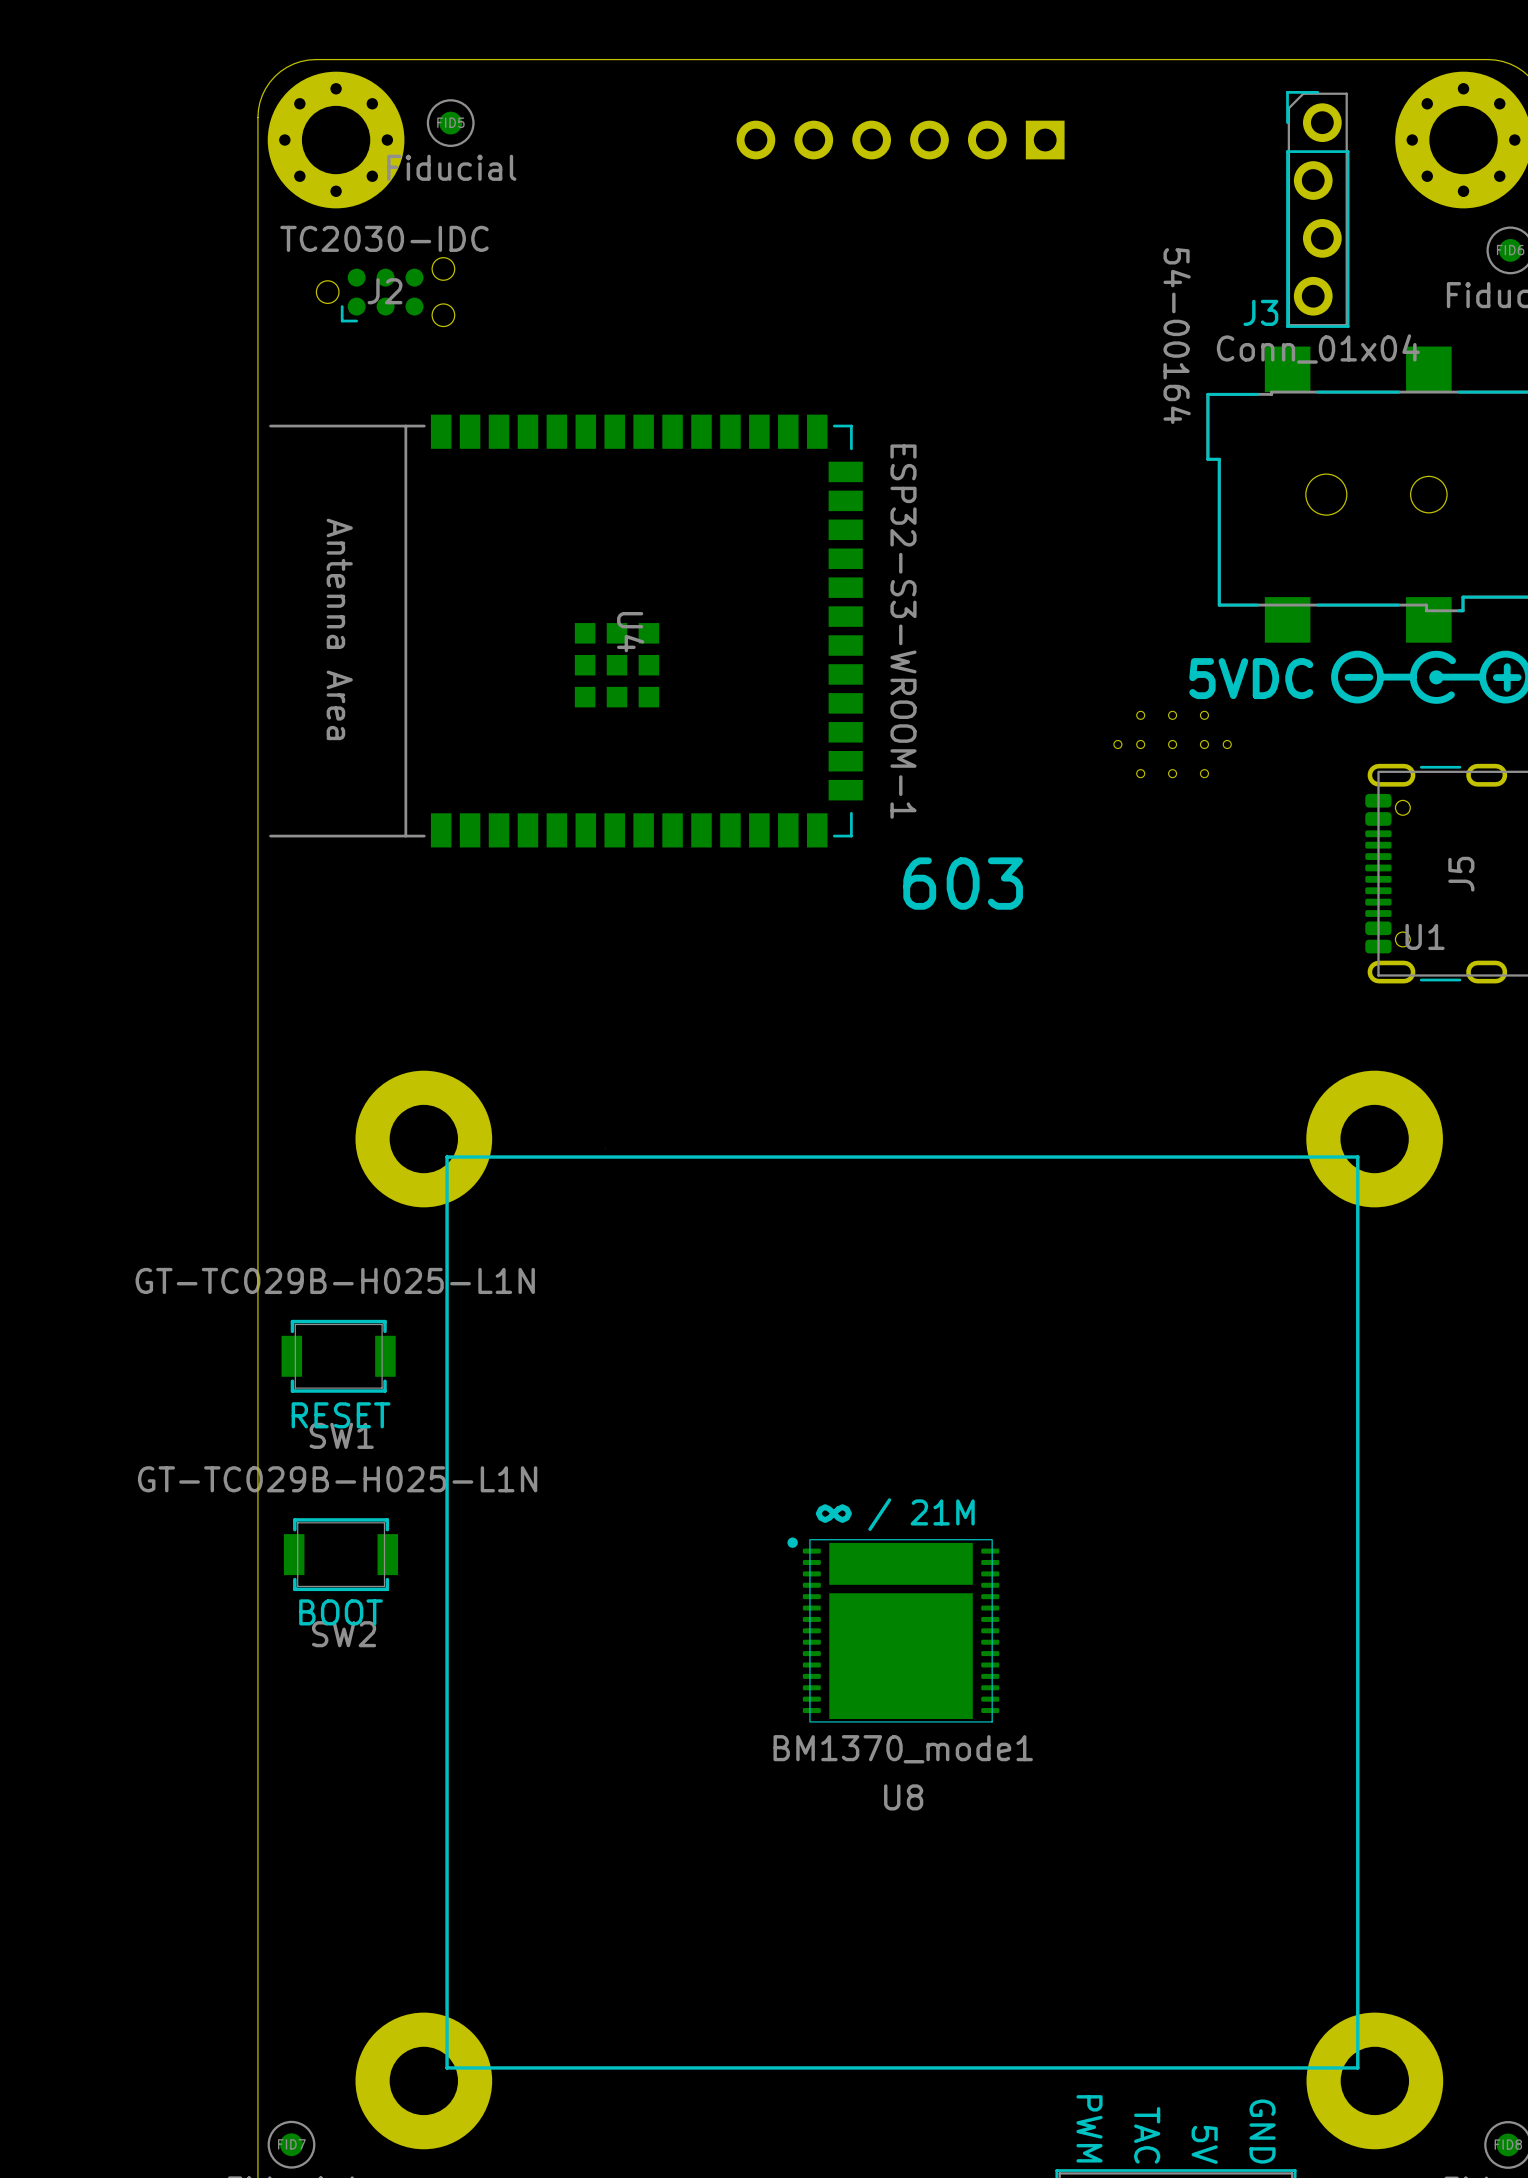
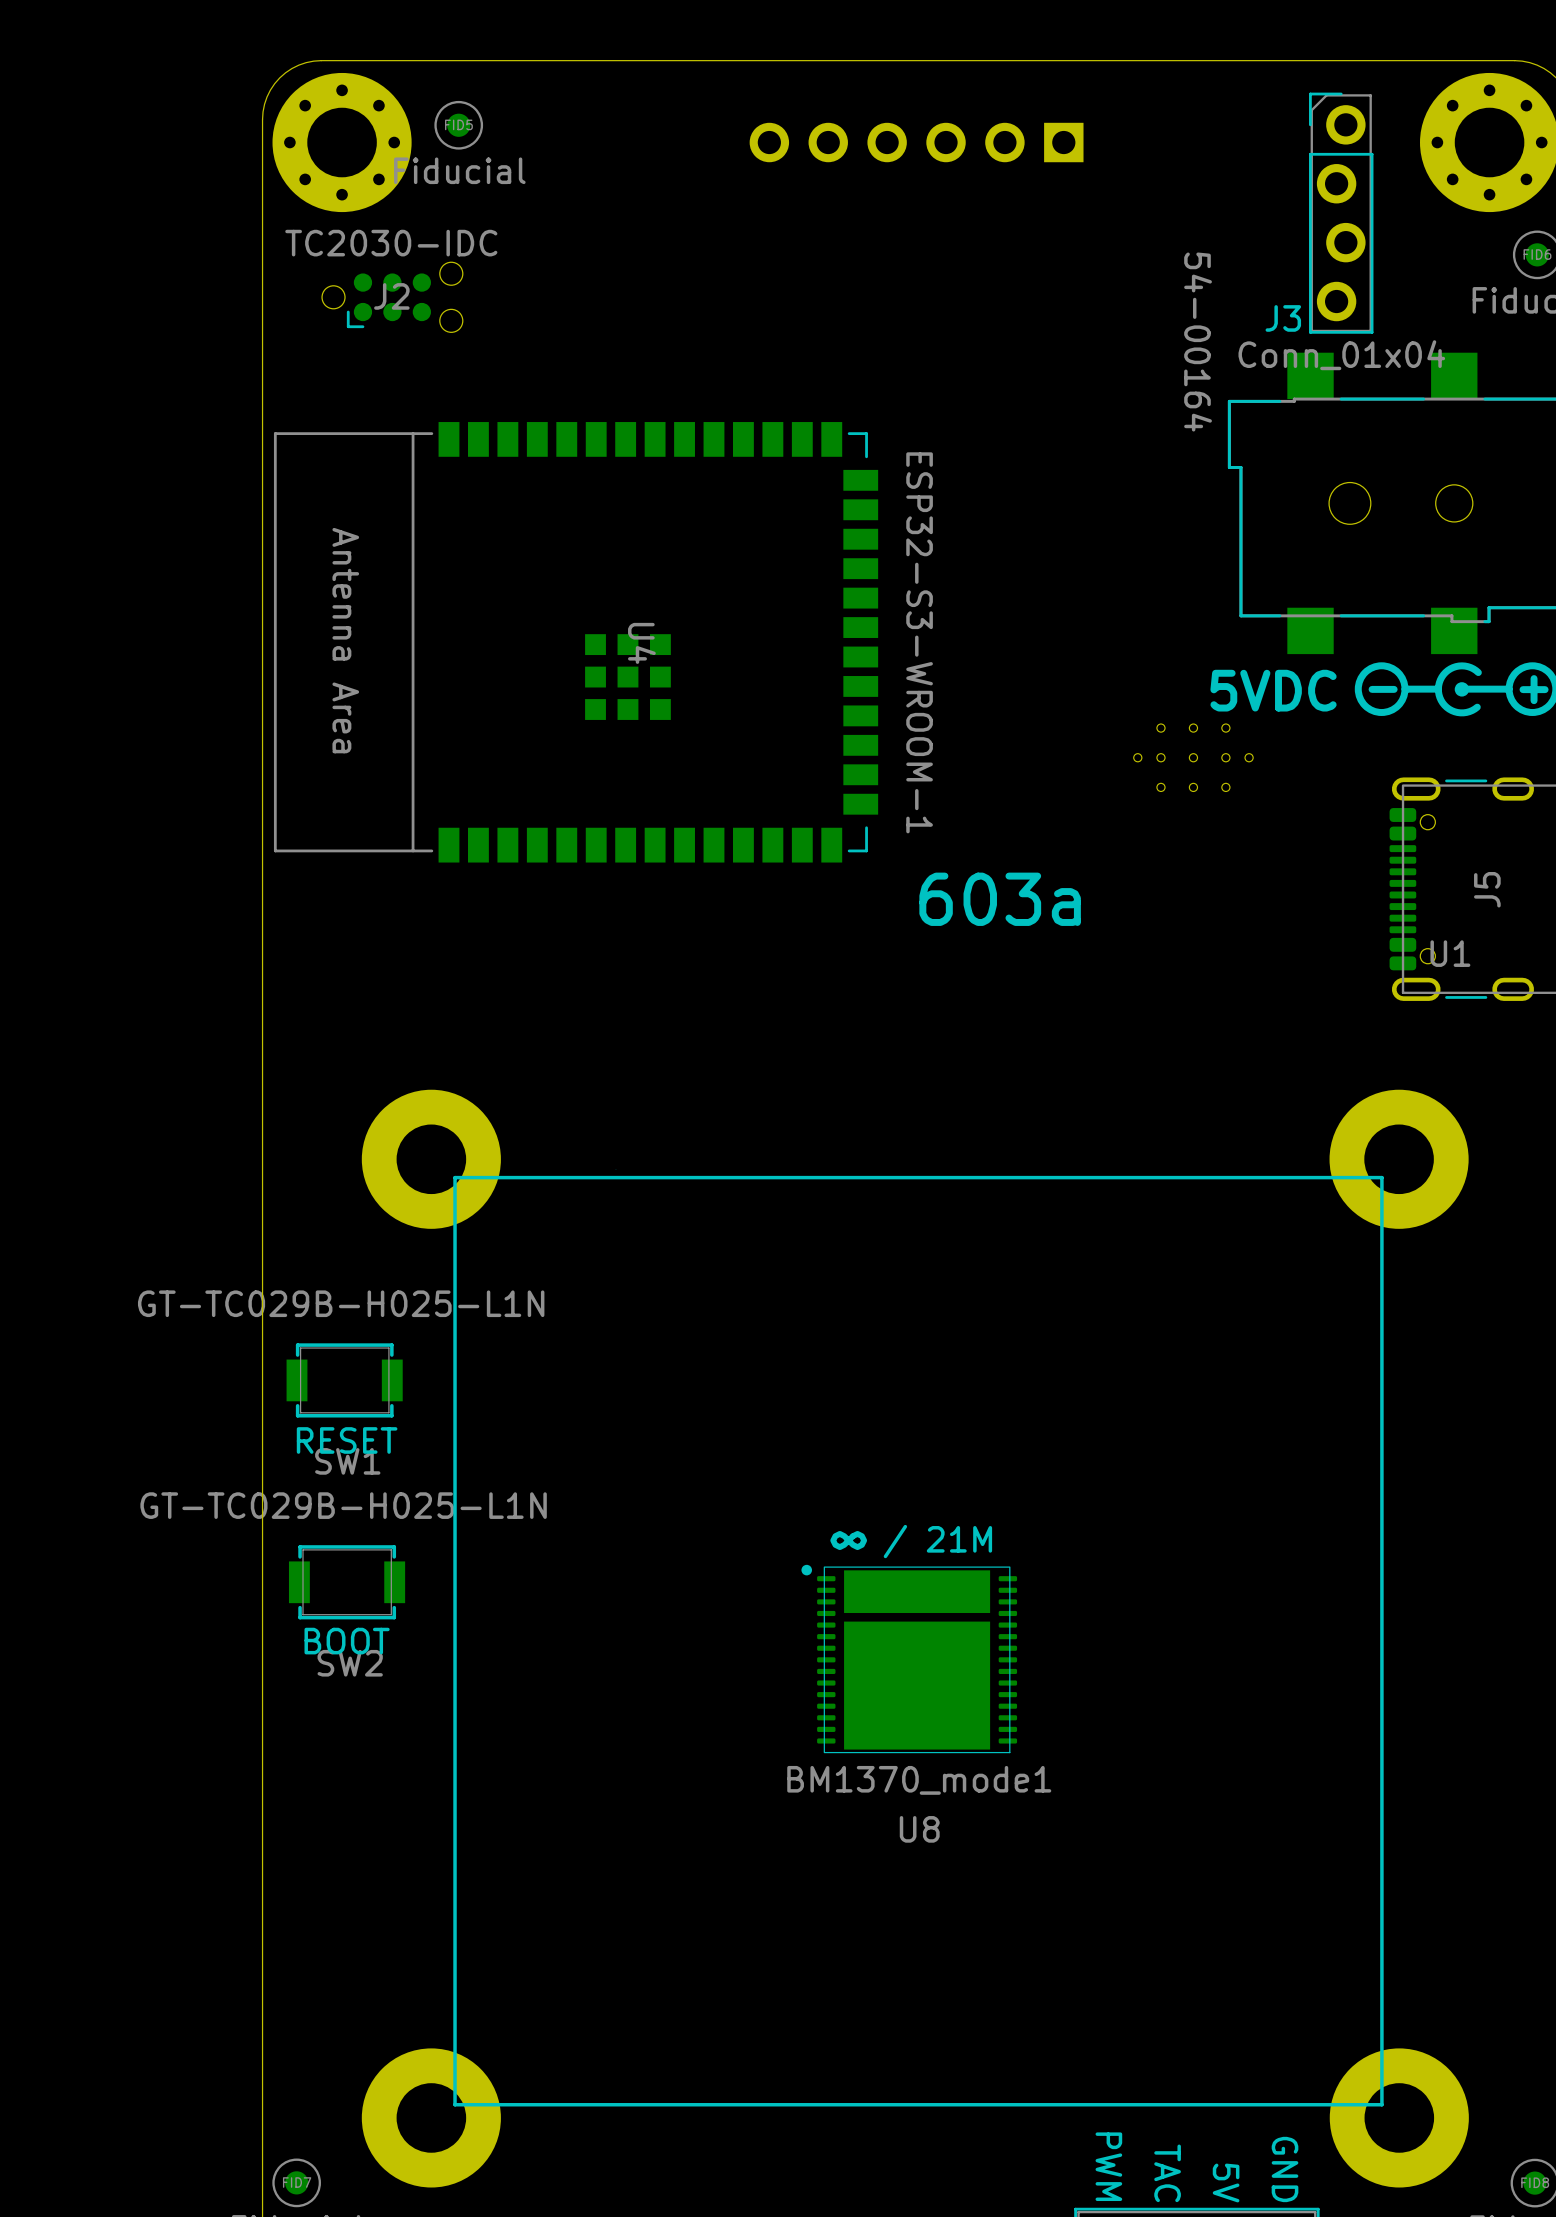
U4 footprint: [269, 414, 863, 848] -> [273, 422, 879, 863]
text: 603 (963, 883) -> 603a (1000, 899)

